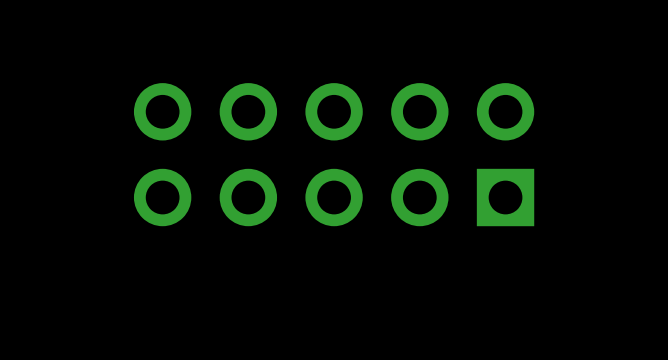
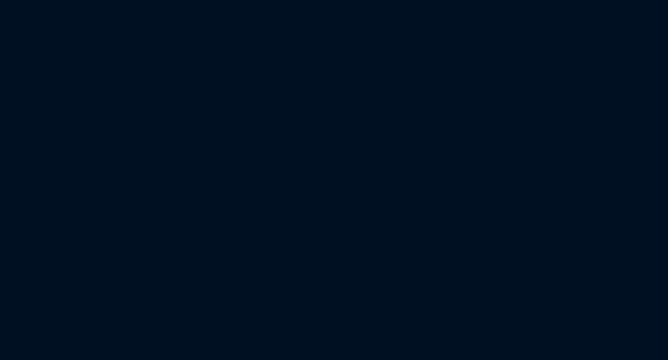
part: (334, 154) -> none

